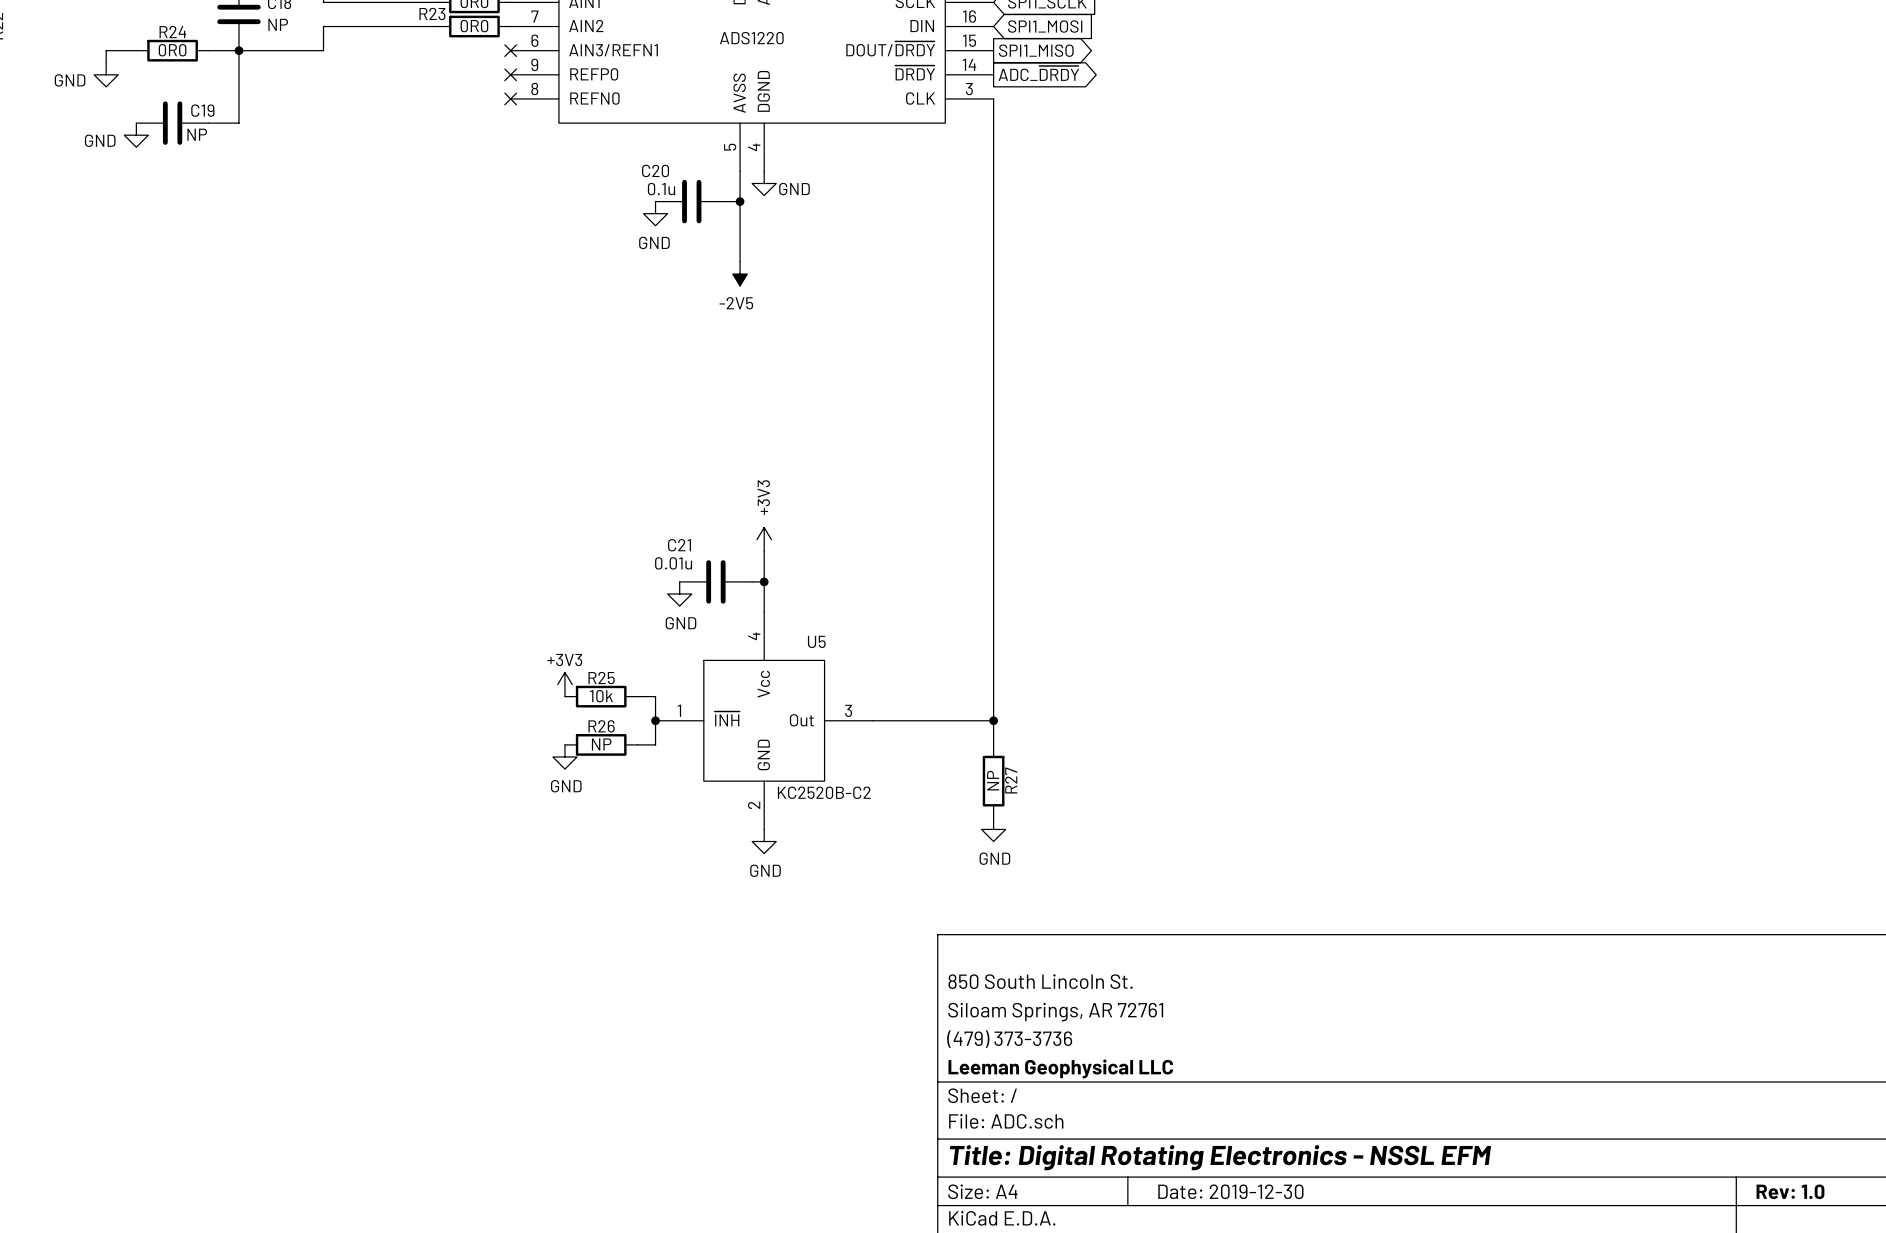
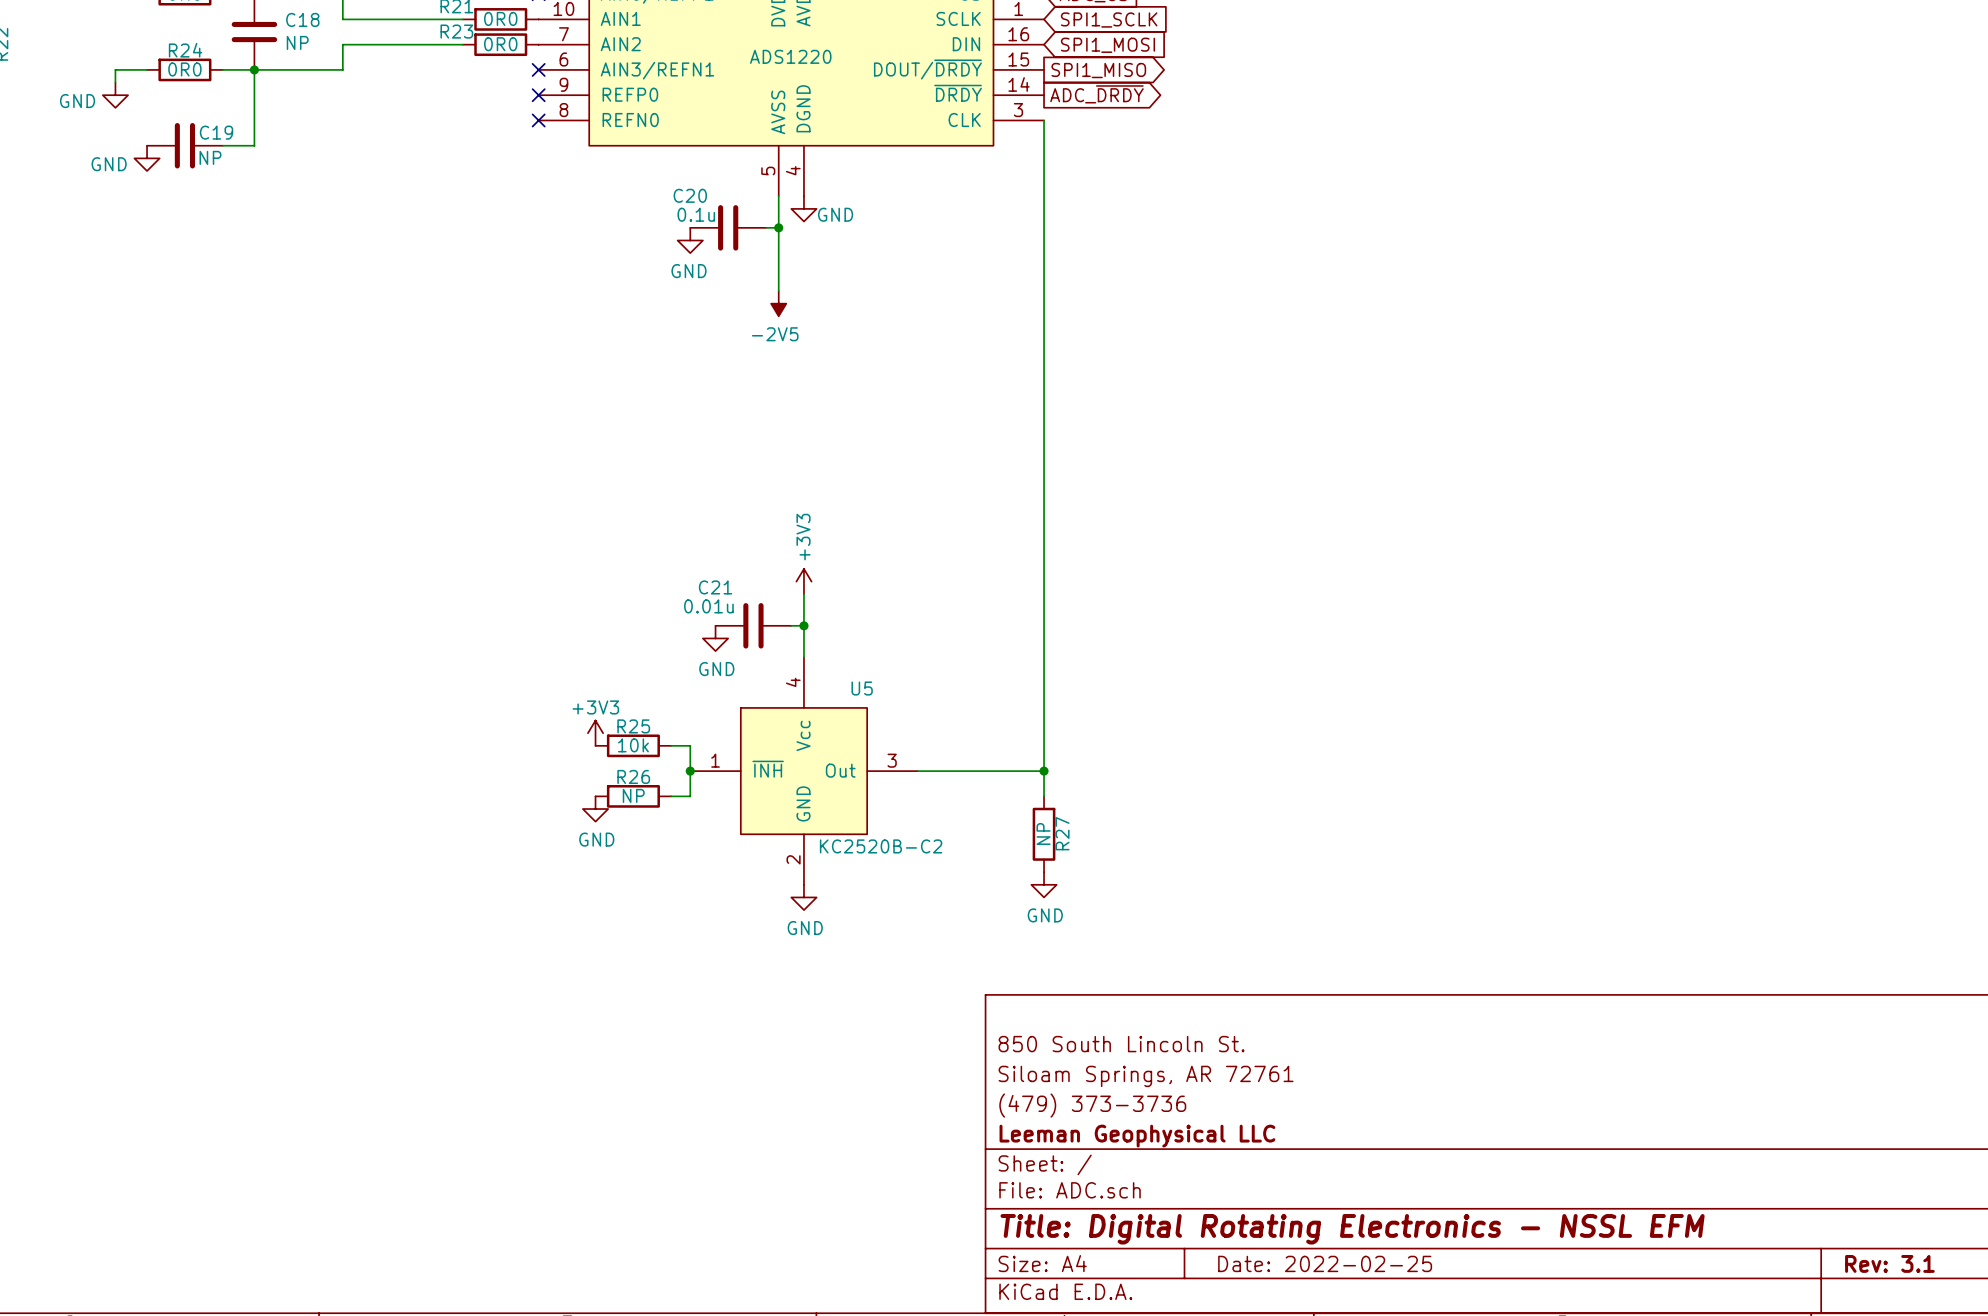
title block: Date: 2019-12-30 (1230, 1191) -> Date: 2022-02-25 (1325, 1263)
title block: Rev: 1.0 (1790, 1191) -> Rev: 3.1 (1889, 1263)

